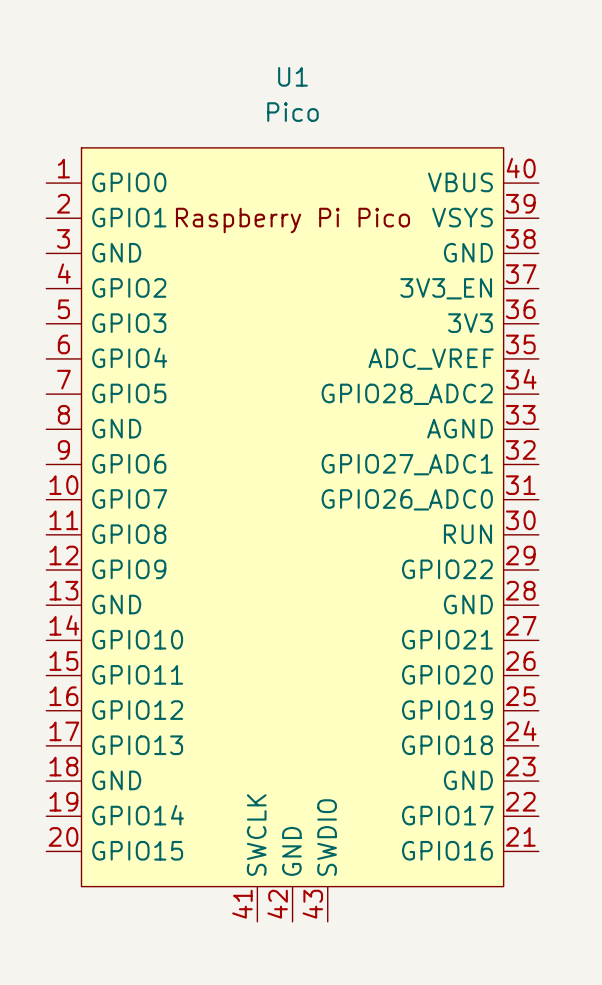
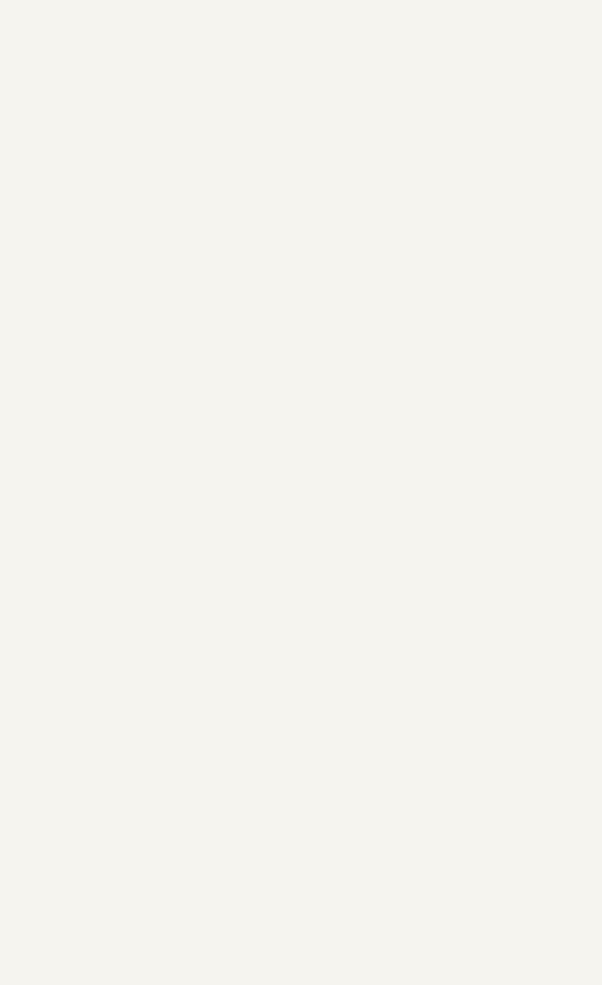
U1: Pico (292, 534) -> none

